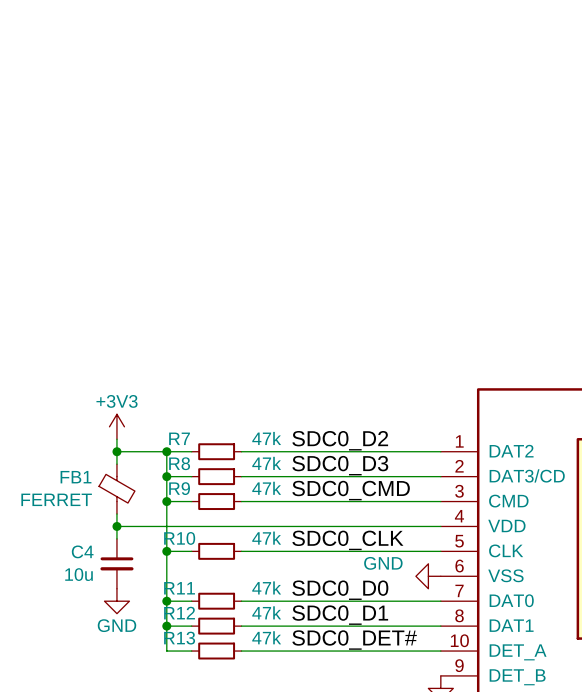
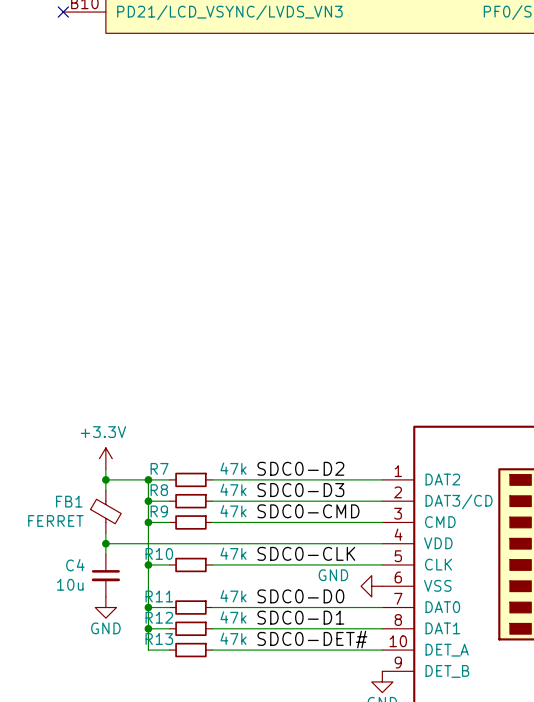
power symbol: +3V3 (116, 426) -> +3.3V (105, 458)
label: SDC0_D2 (340, 440) -> SDC0-D2 (300, 468)
label: SDC0_D3 (340, 465) -> SDC0-D3 (300, 490)
label: SDC0_CMD (351, 490) -> SDC0-CMD (308, 511)
label: SDC0_CLK (347, 540) -> SDC0-CLK (306, 553)
label: SDC0_D0 (340, 590) -> SDC0-D0 (300, 596)
label: SDC0_D1 (340, 615) -> SDC0-D1 (300, 617)
label: SDC0_DET# (354, 640) -> SDC0-DET# (312, 639)

